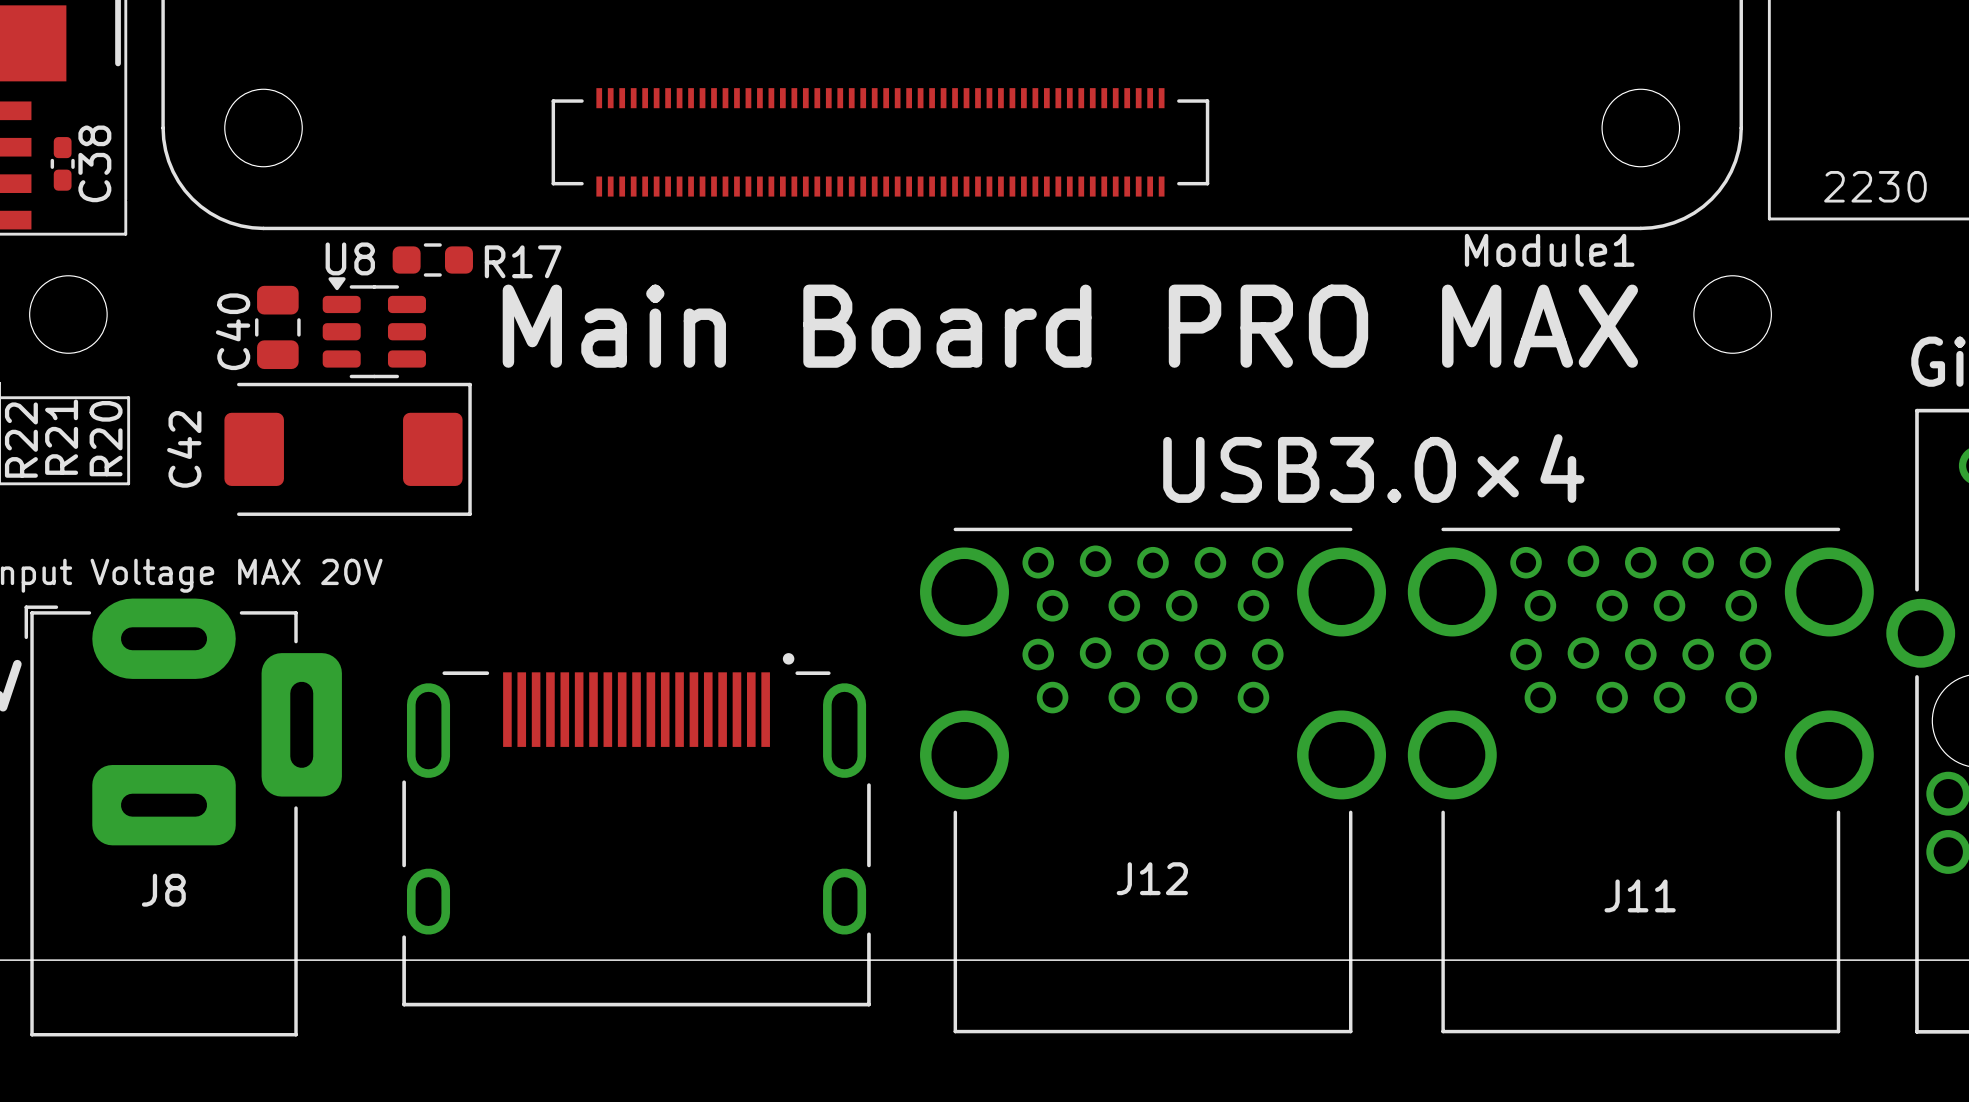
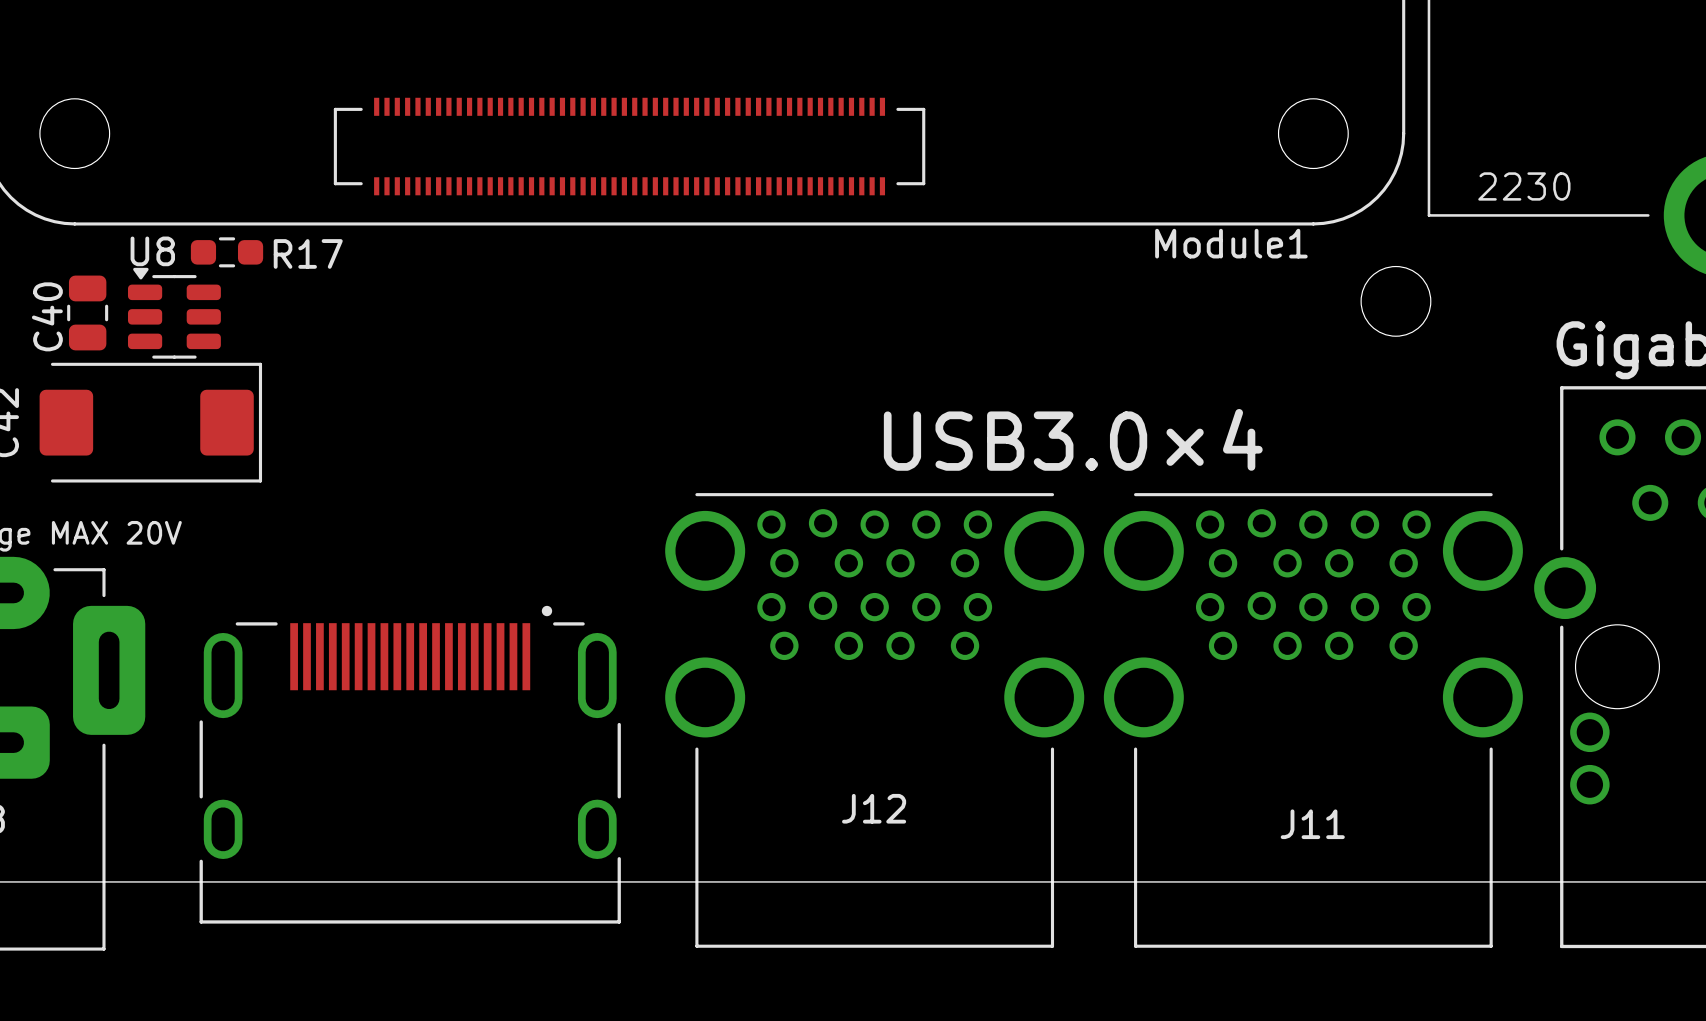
text: Main Board PRO MAX (1070, 326) -> none

